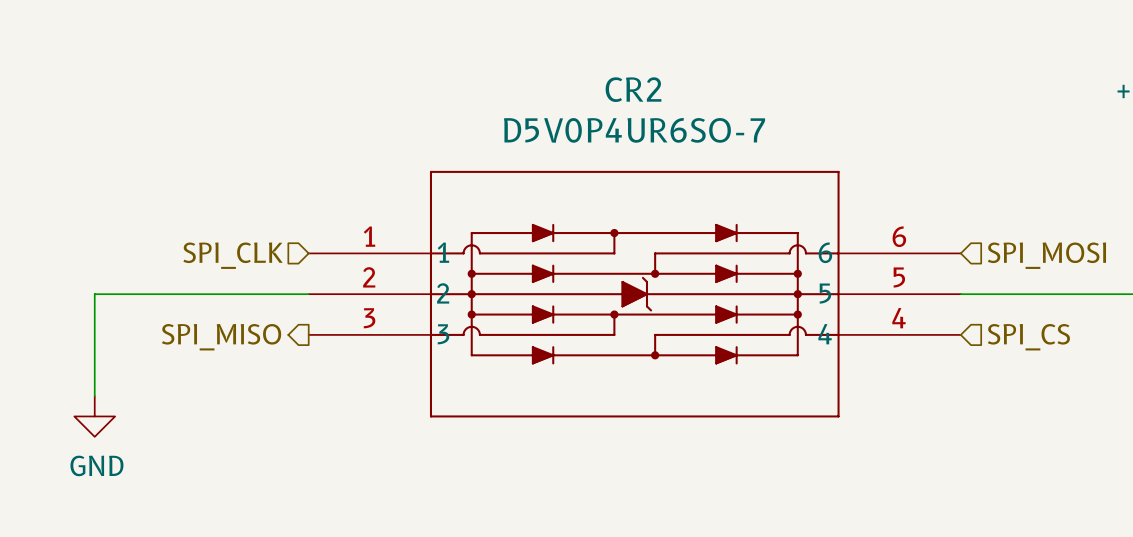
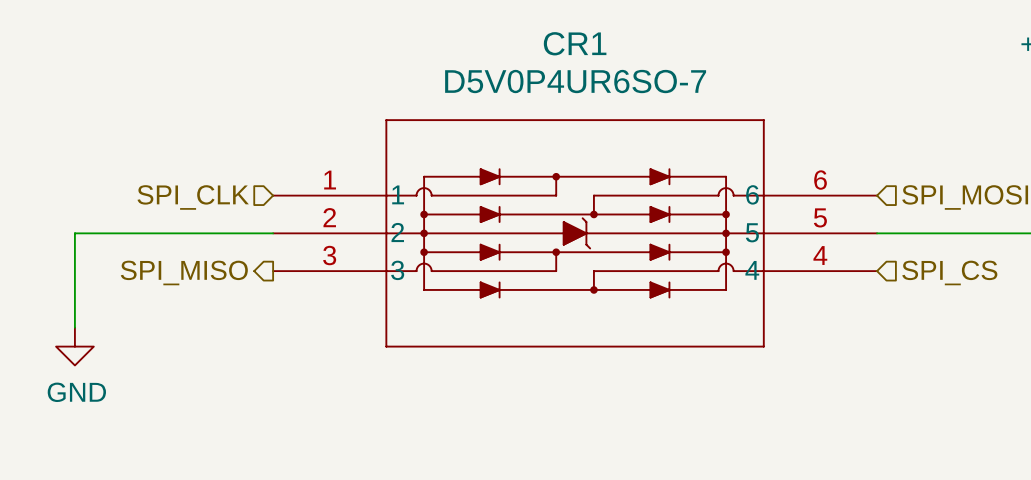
CR2 name: CR2 (633, 89) -> CR1 (575, 43)

